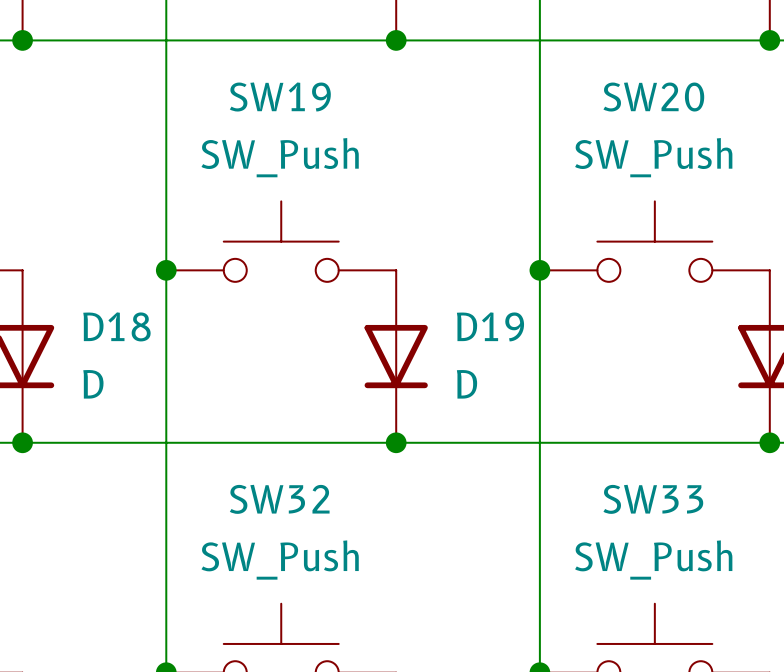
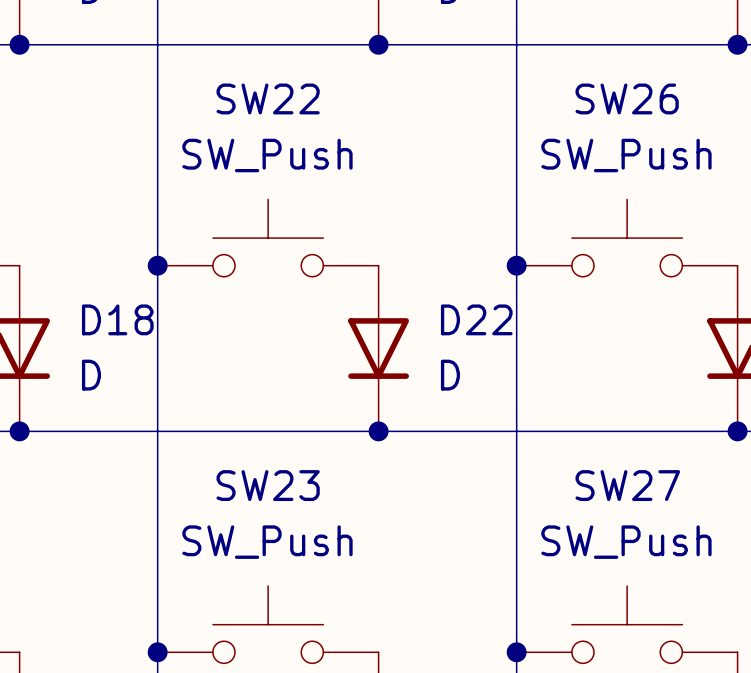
SW19 name: SW19 (280, 97) -> SW22 (268, 98)
SW20 name: SW20 (653, 97) -> SW26 (627, 98)
D19 name: D19 (490, 326) -> D22 (476, 319)
SW32 name: SW32 (279, 499) -> SW23 (268, 485)
SW33 name: SW33 (653, 499) -> SW27 (627, 485)

